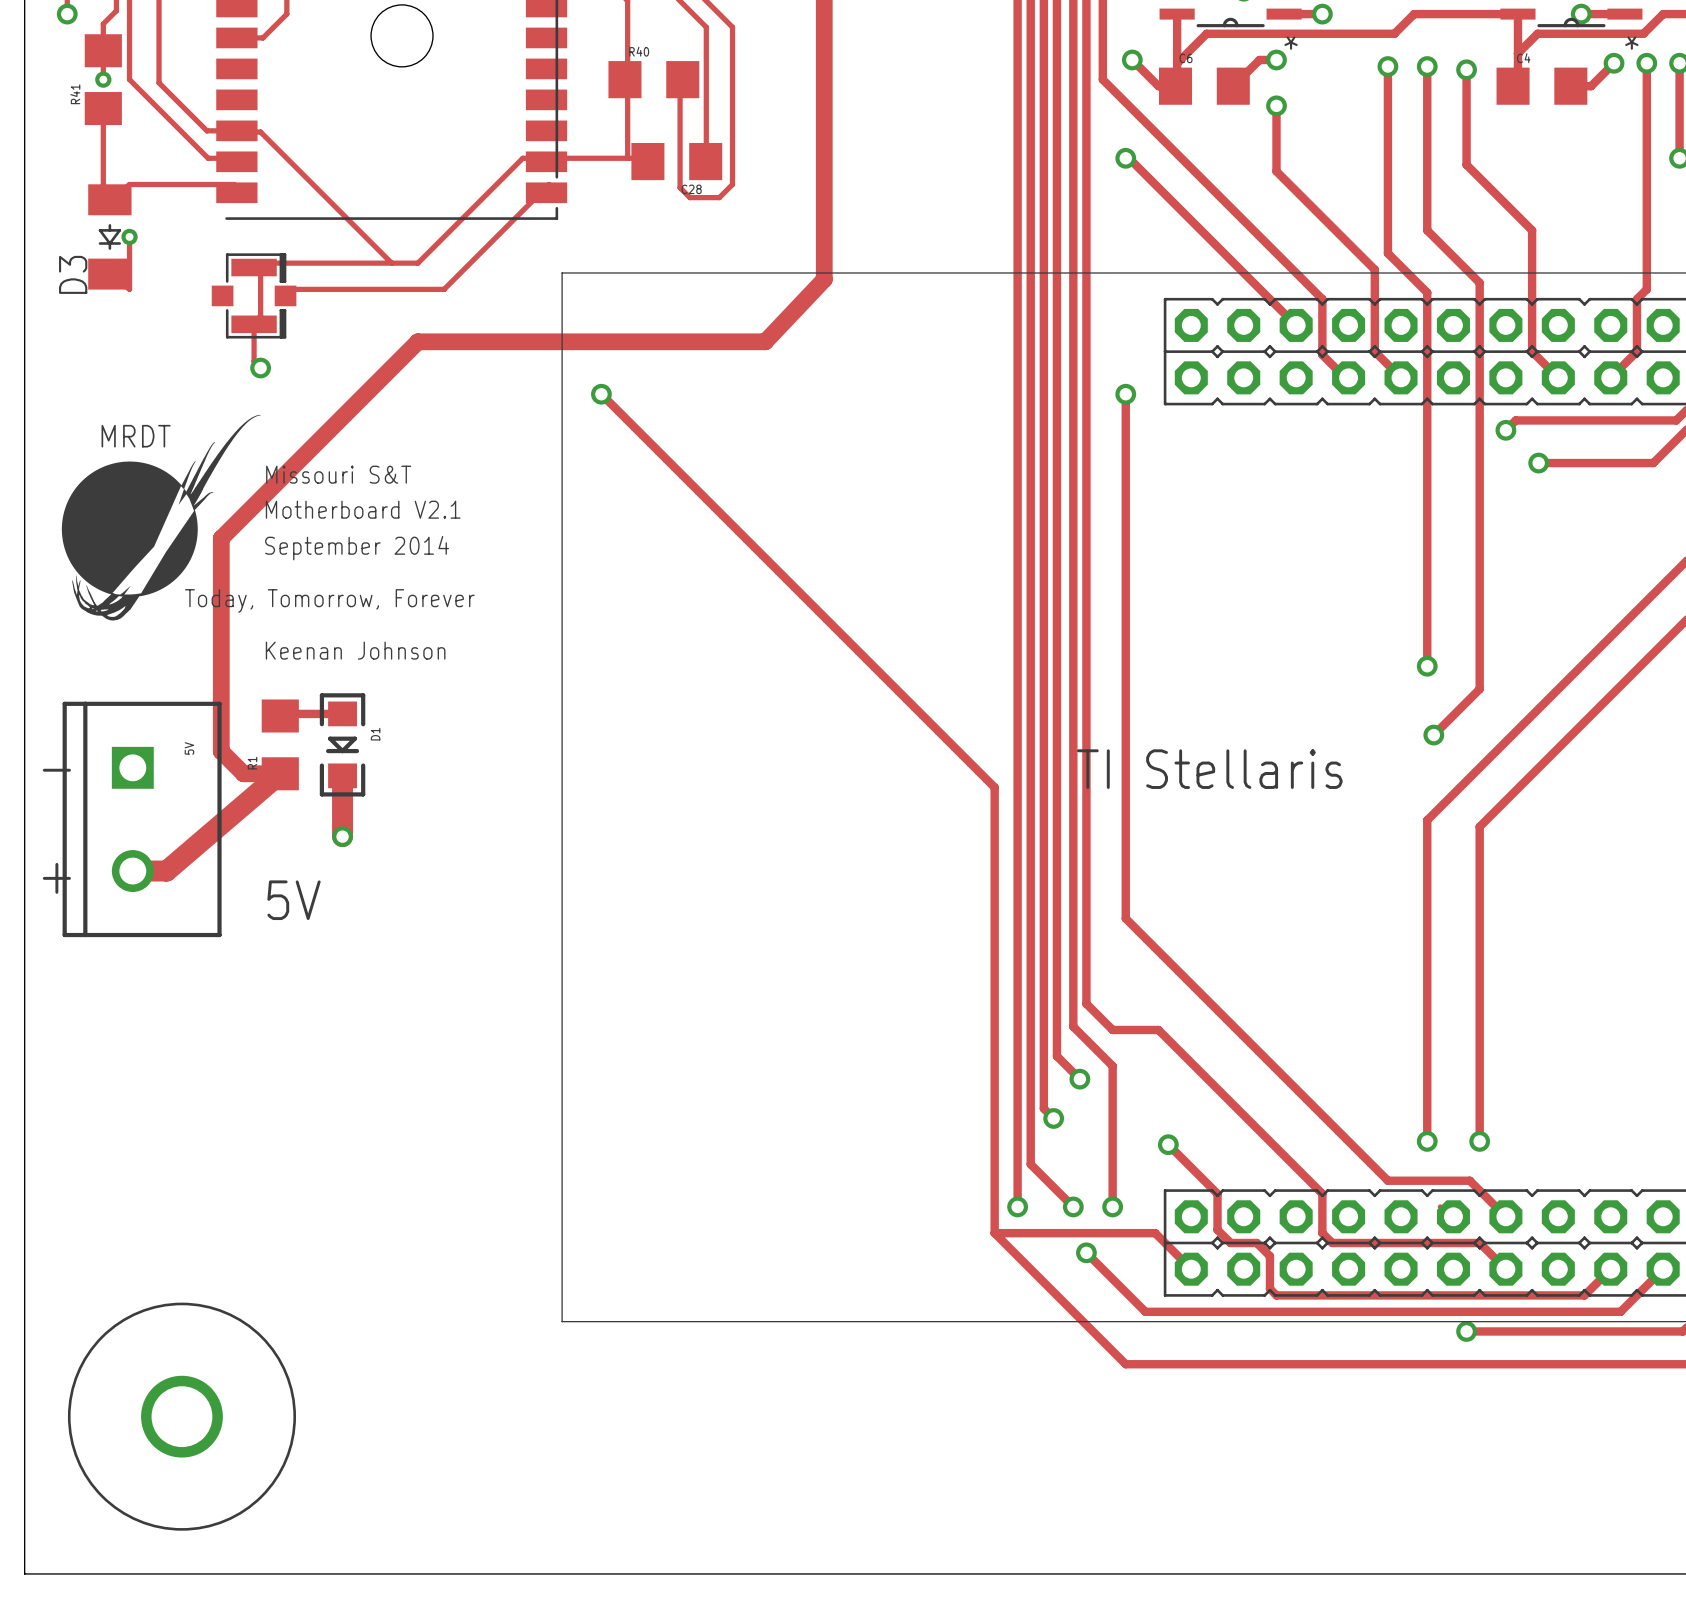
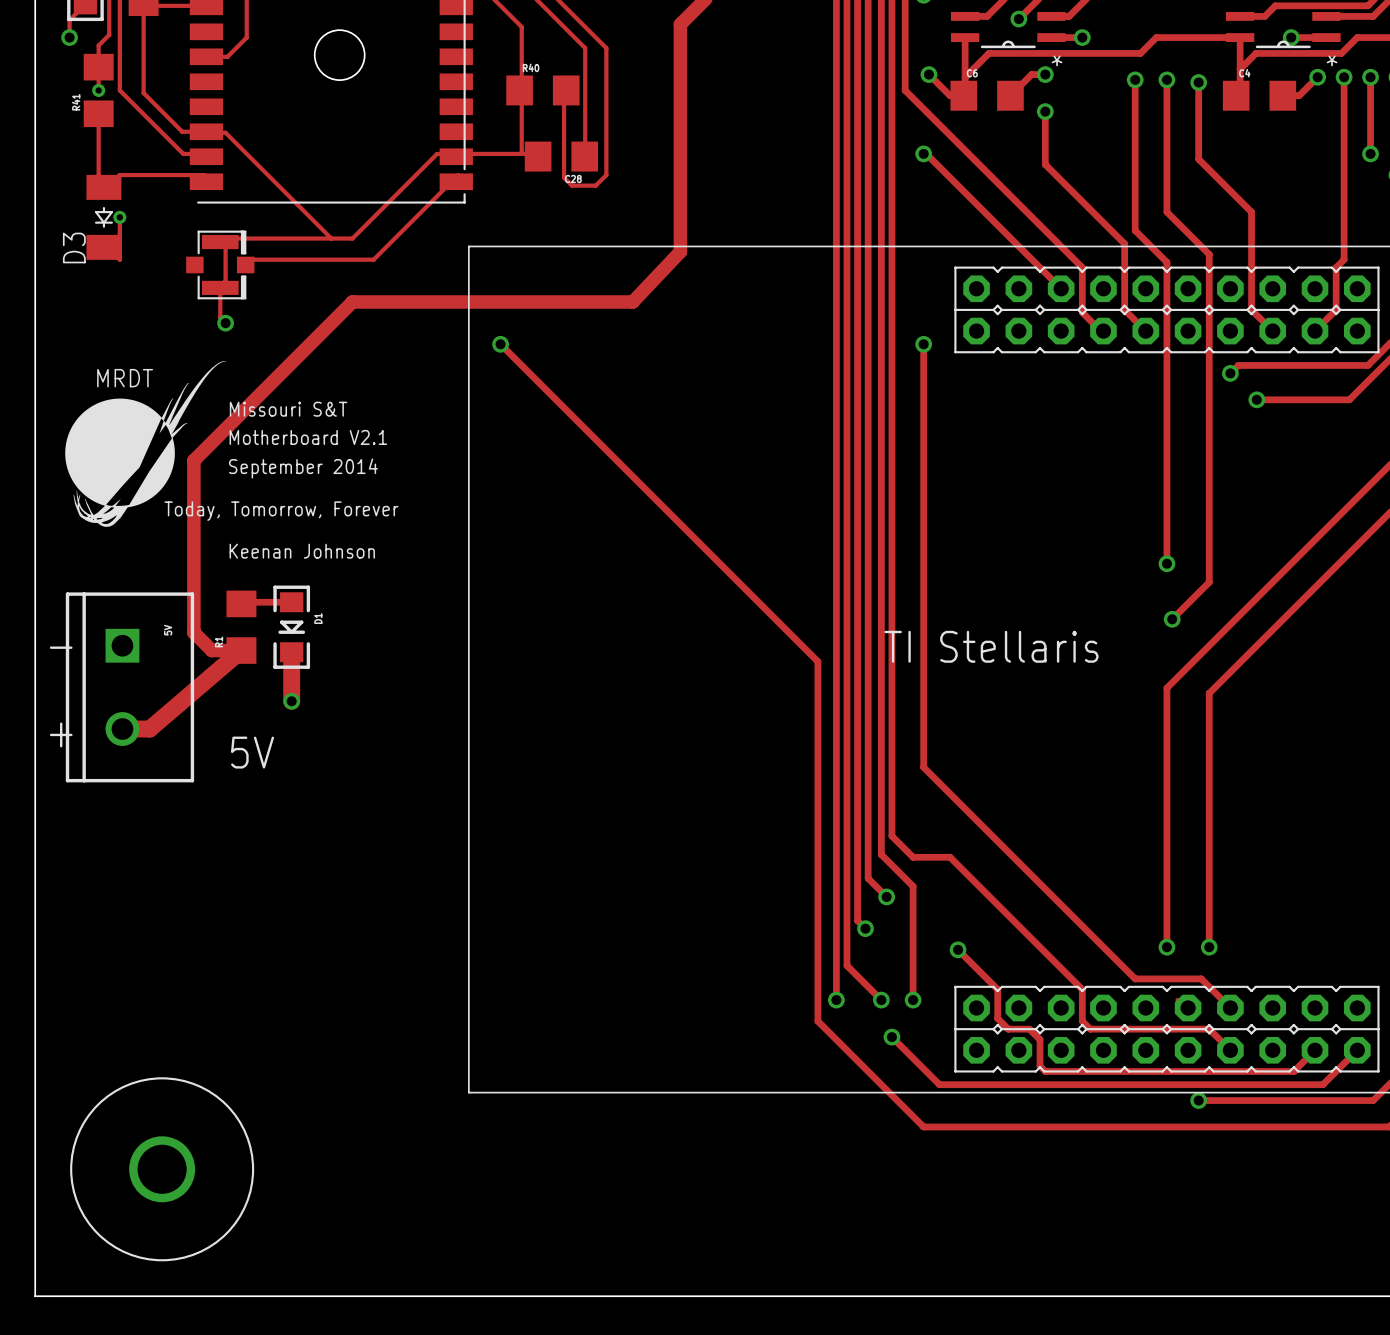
track: (994, 1233) (1155, 1233) (1191, 1269) -> none

